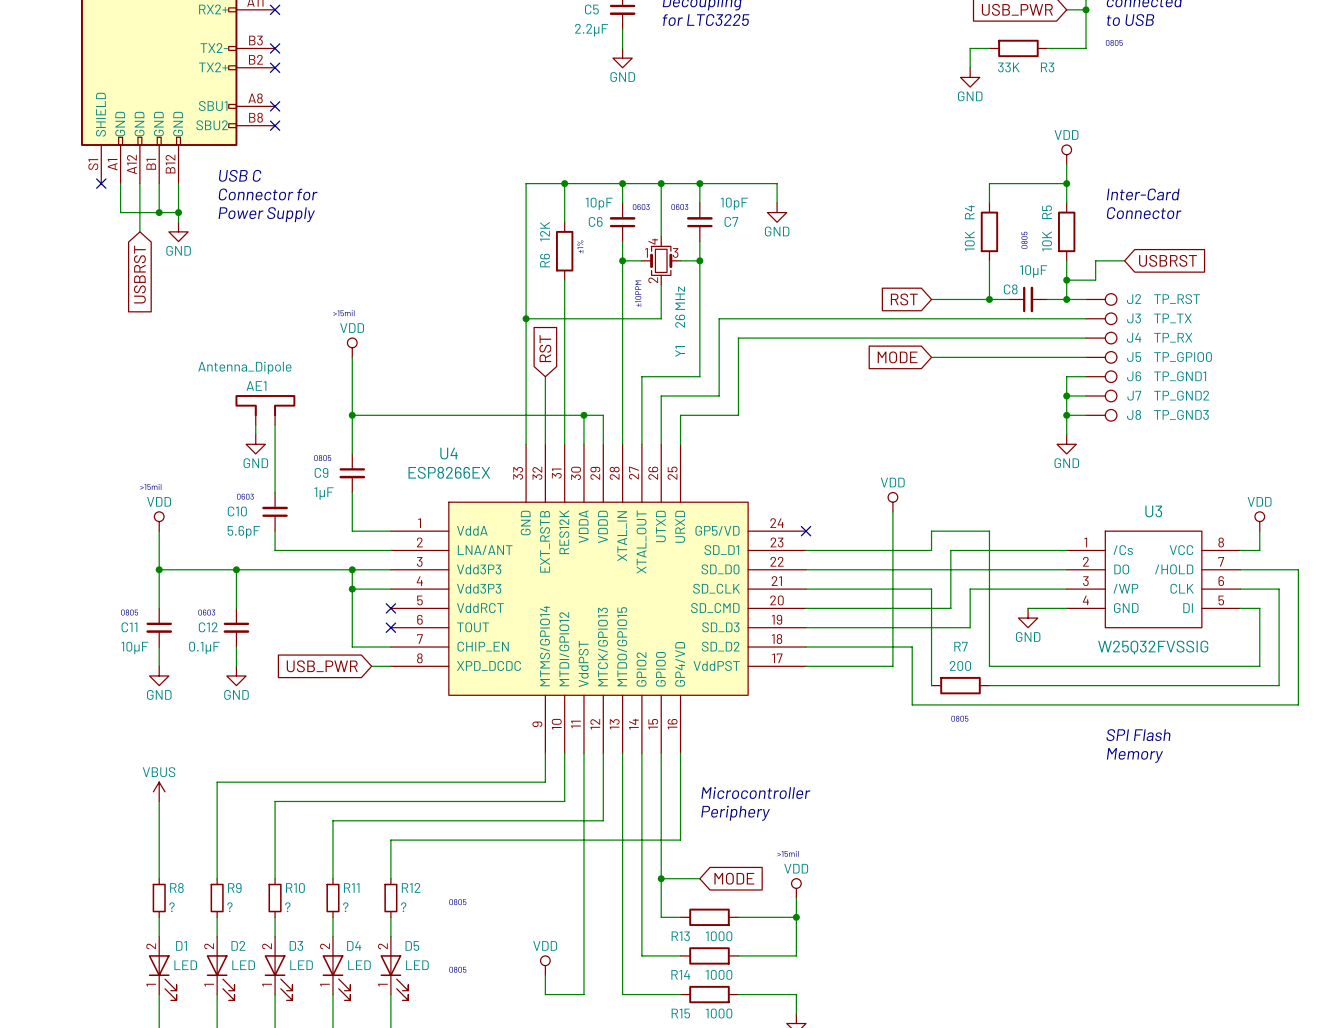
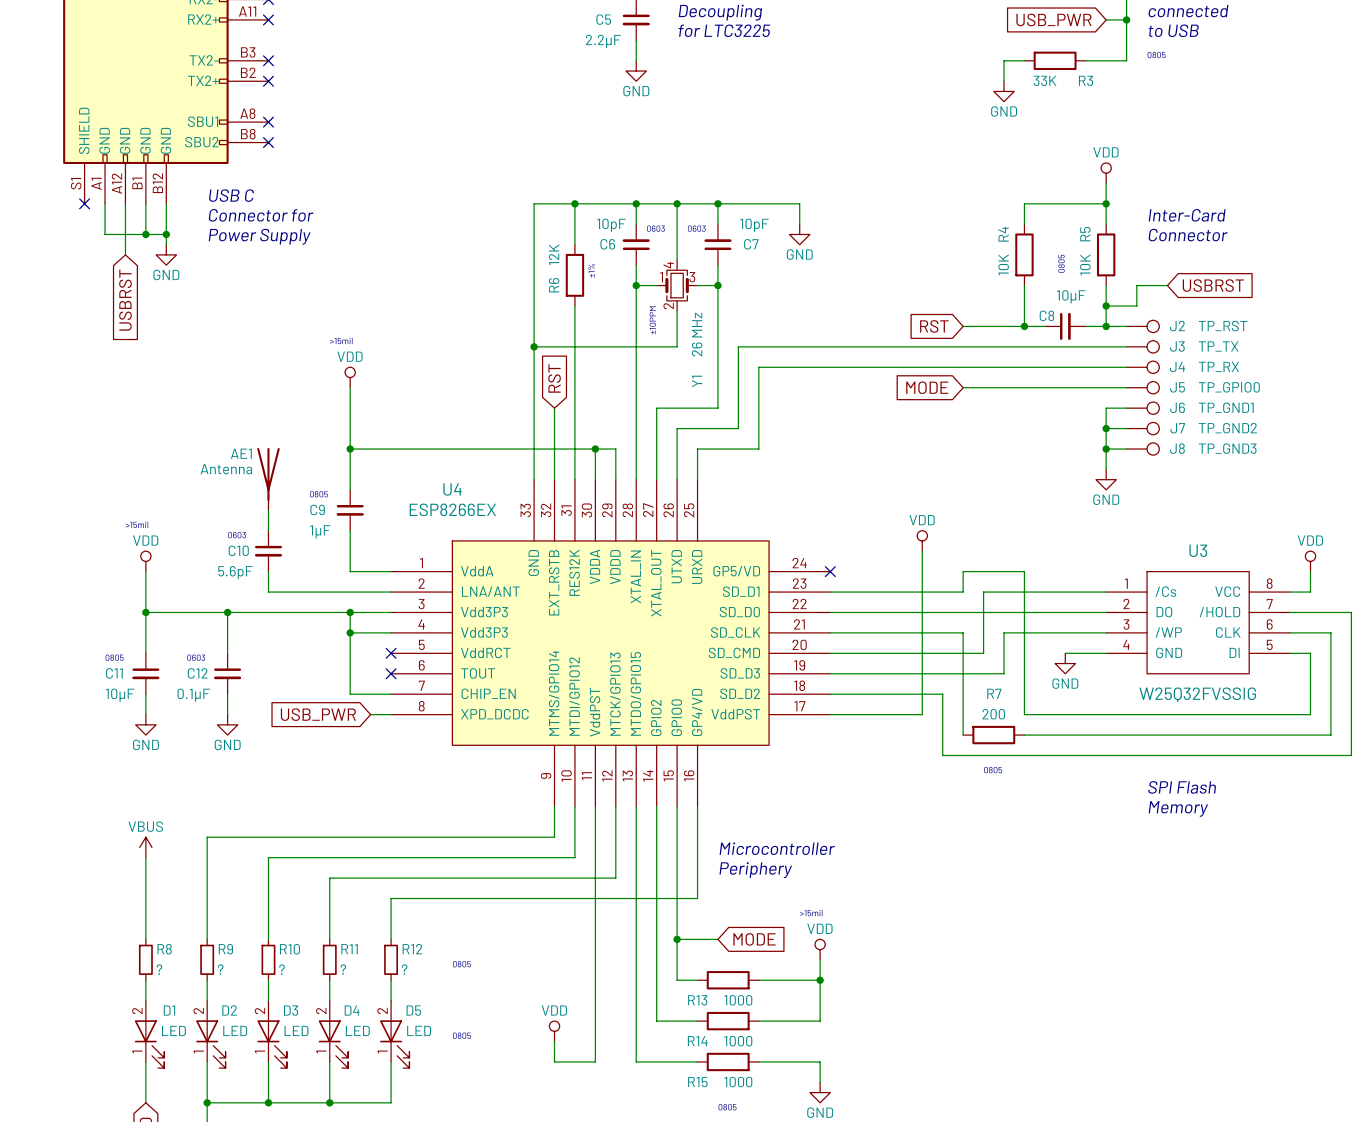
AE1 value: Antenna_Dipole (244, 367) -> Antenna (226, 469)
AE1 name position: AE1 (256, 385) -> AE1 (241, 453)
AE1 symbol: [235, 395, 296, 425] -> [257, 448, 280, 511]
wire: (255, 424) (255, 434) -> none
power symbol: GND (255, 444) -> none
C10 rotation: 0° (275, 511) -> 180° (268, 551)

